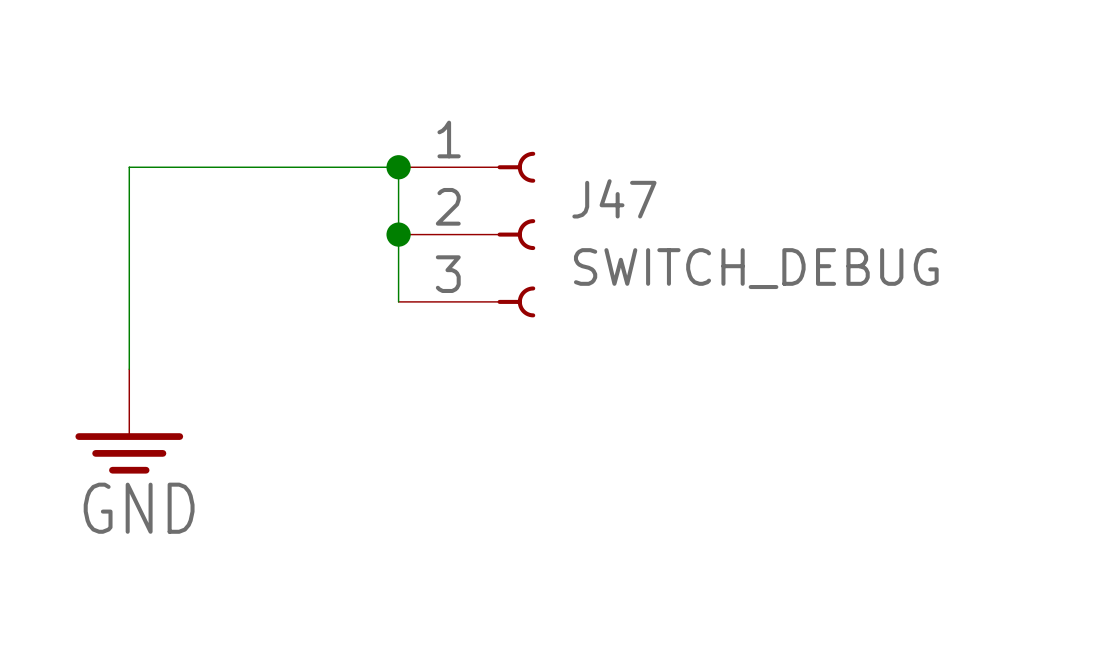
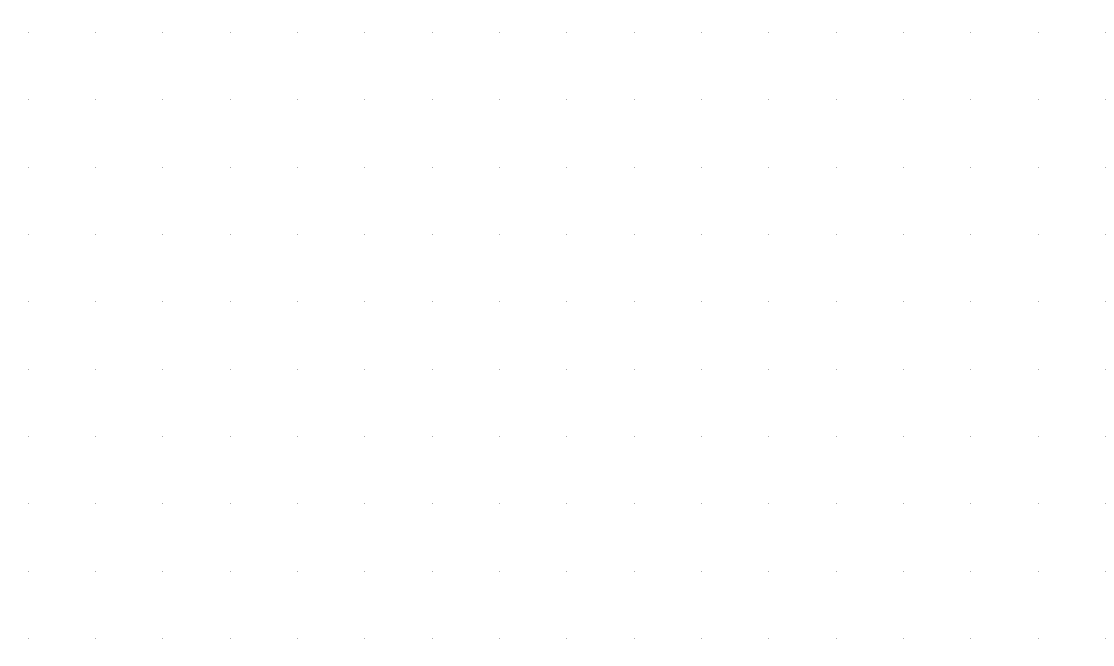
junction: (398, 167) -> none
junction: (398, 234) -> none
J47: SWITCH_DEBUG (466, 234) -> none
wire: (398, 301) (398, 167) (129, 167) (129, 369) -> none
power symbol: GND (129, 421) -> none

